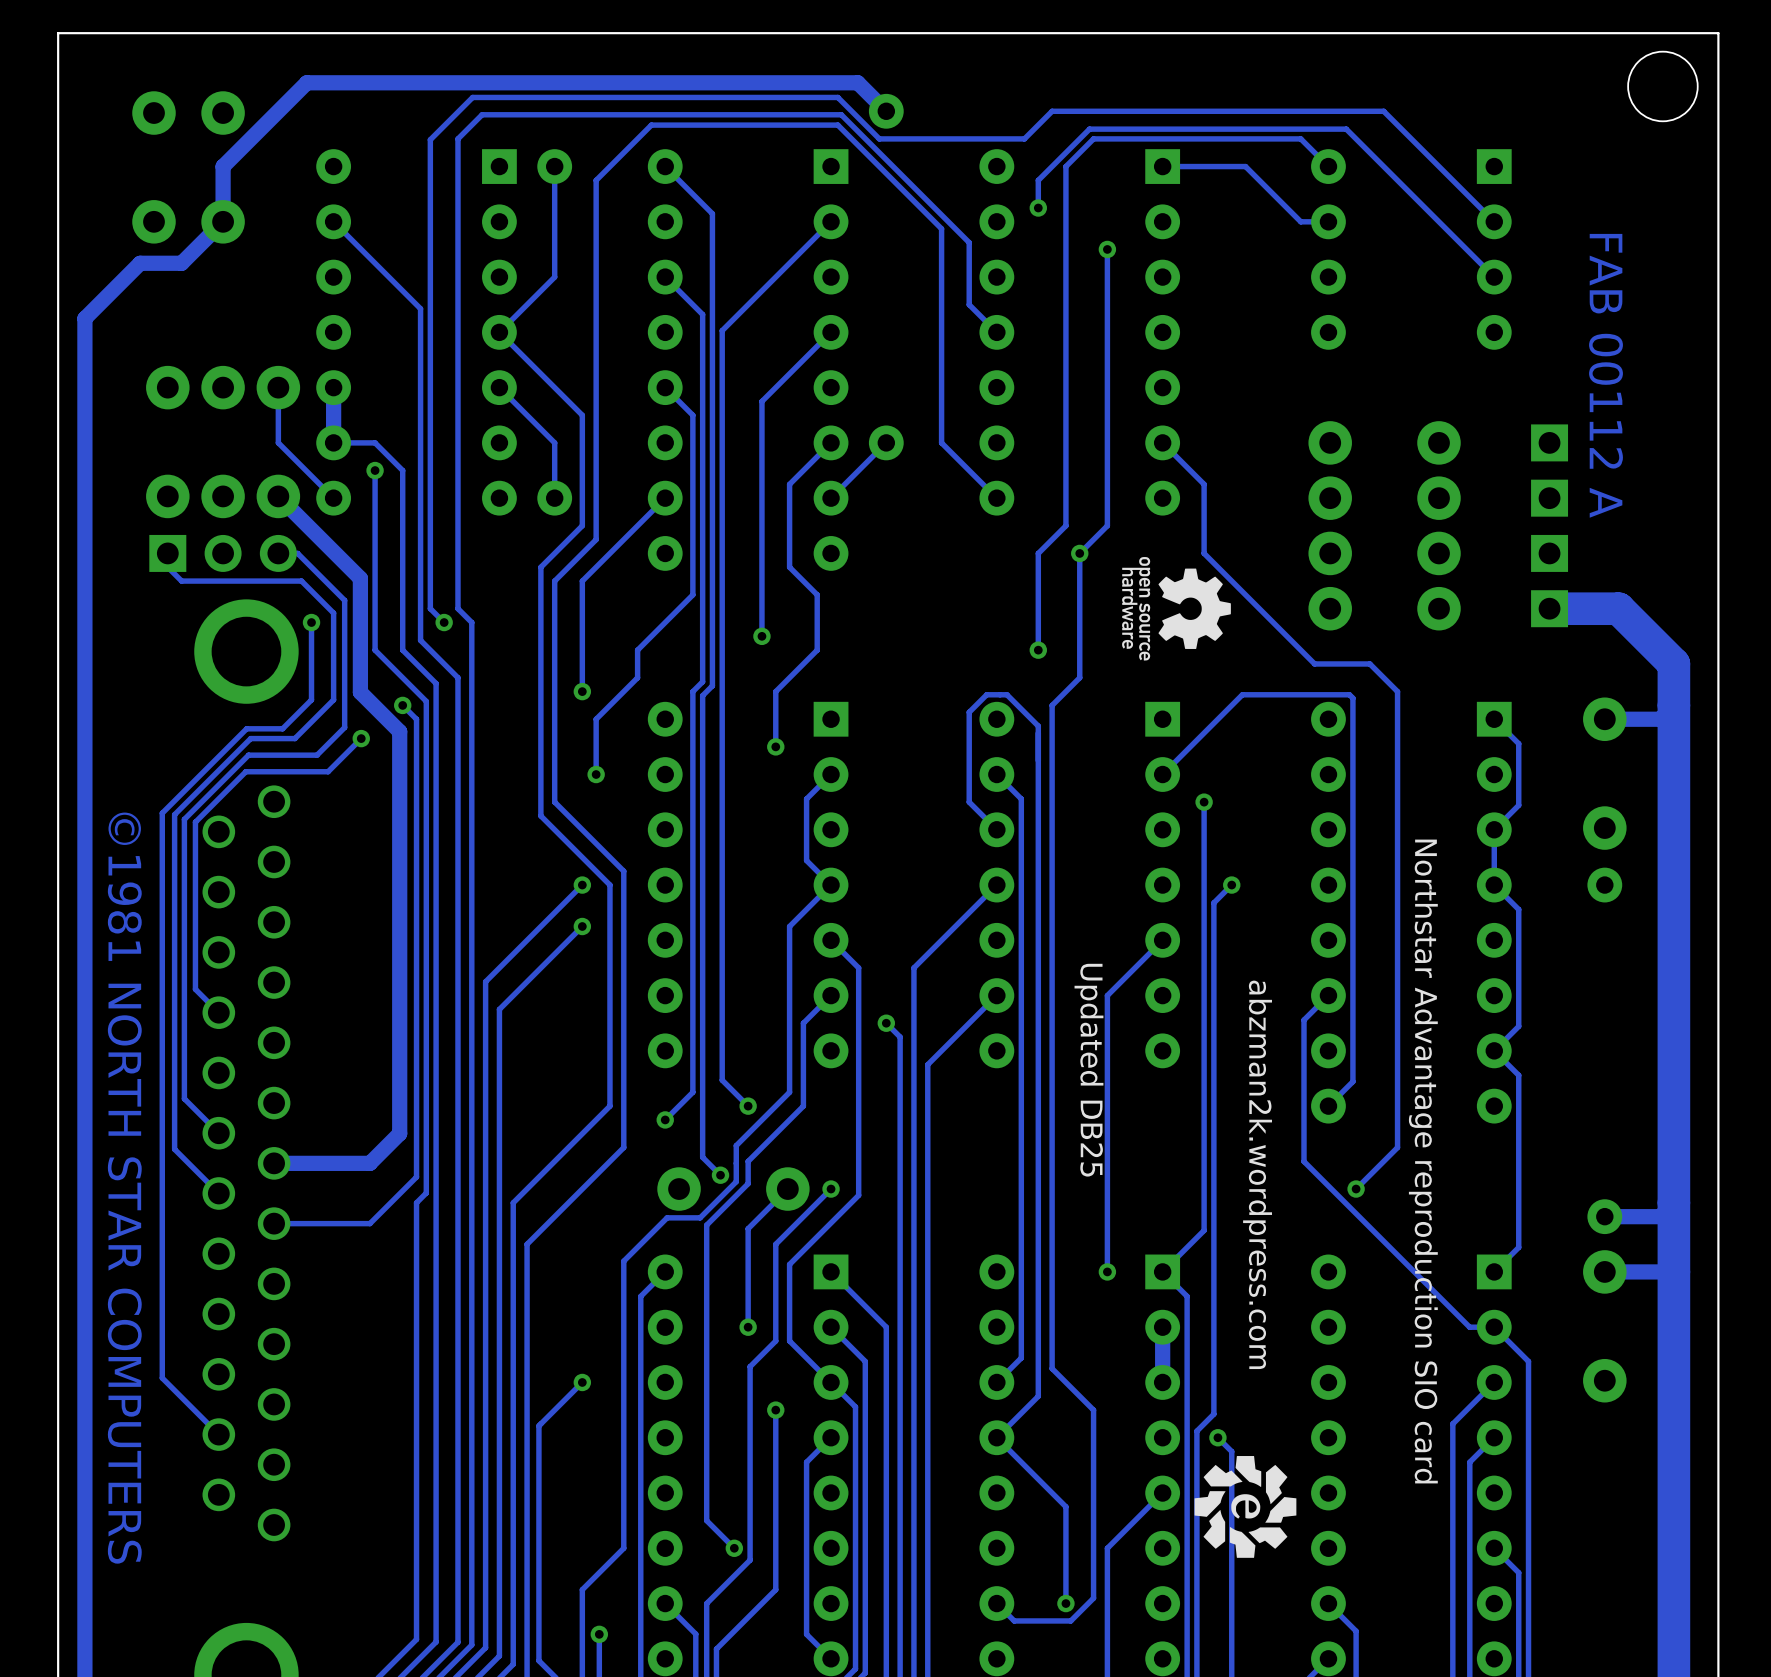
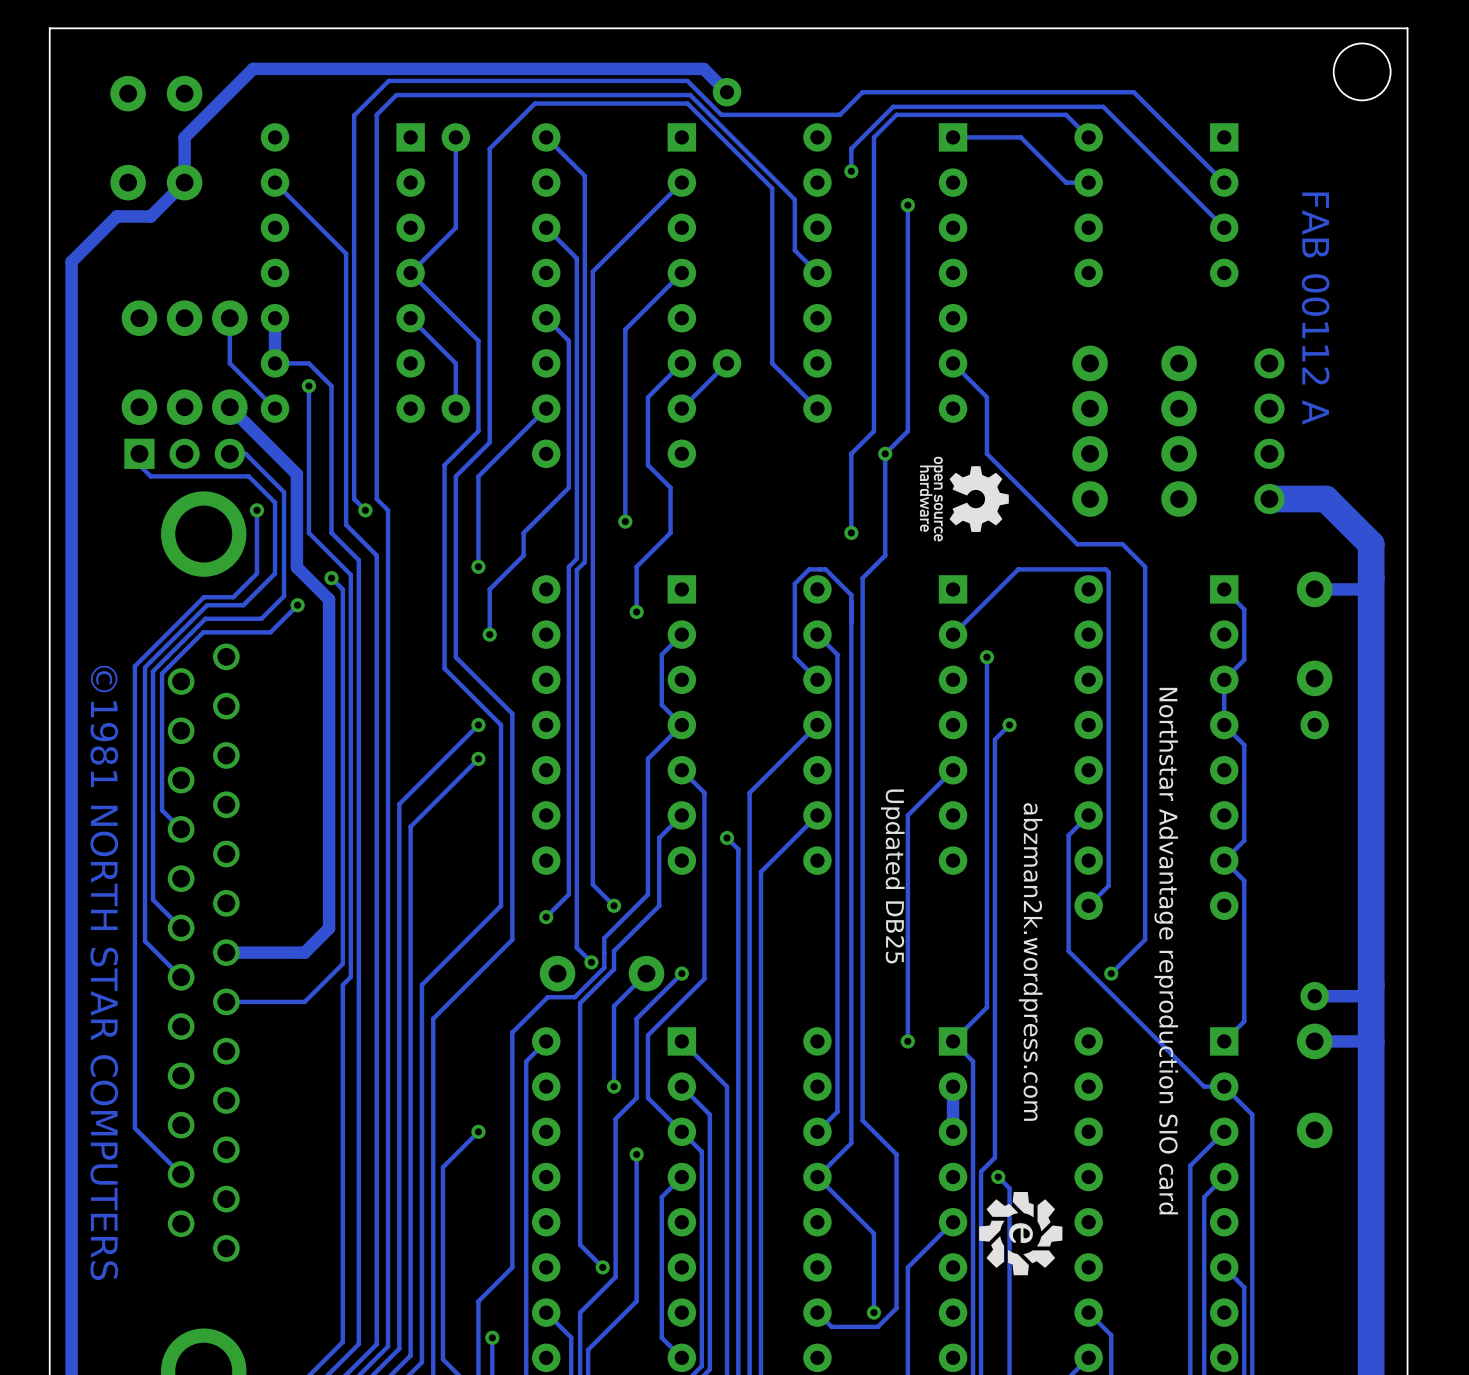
part footprint: [1531, 424, 1569, 462] -> [1254, 348, 1285, 379]
part footprint: [1531, 479, 1569, 517] -> [1254, 393, 1285, 424]
part footprint: [1531, 534, 1569, 572] -> [1254, 438, 1285, 469]
part footprint: [1531, 590, 1569, 628] -> [1254, 483, 1285, 515]

